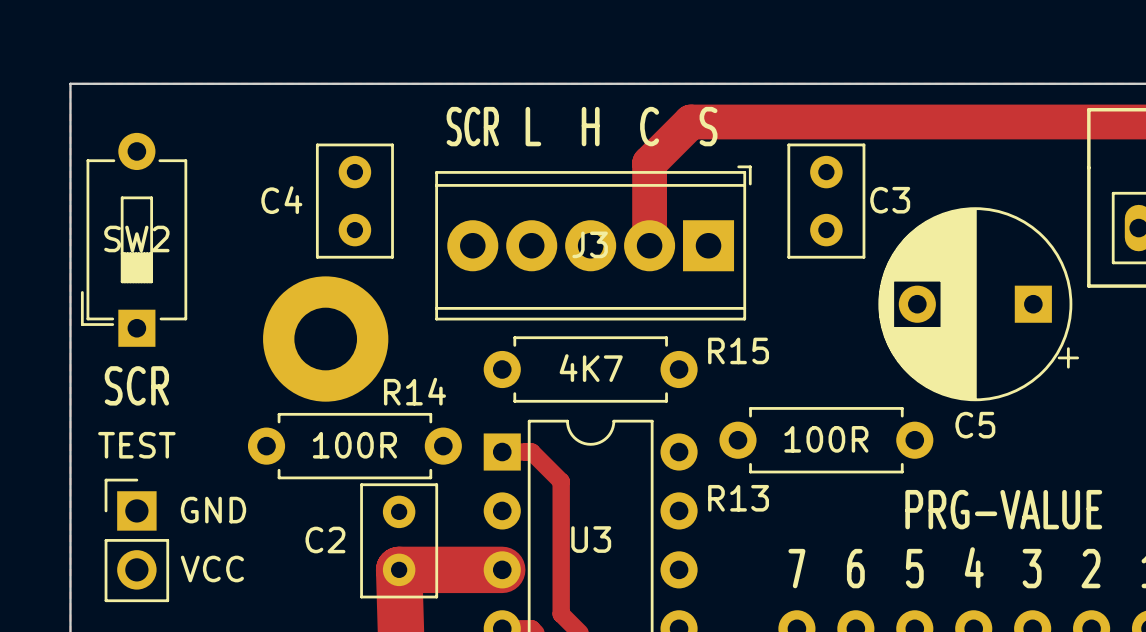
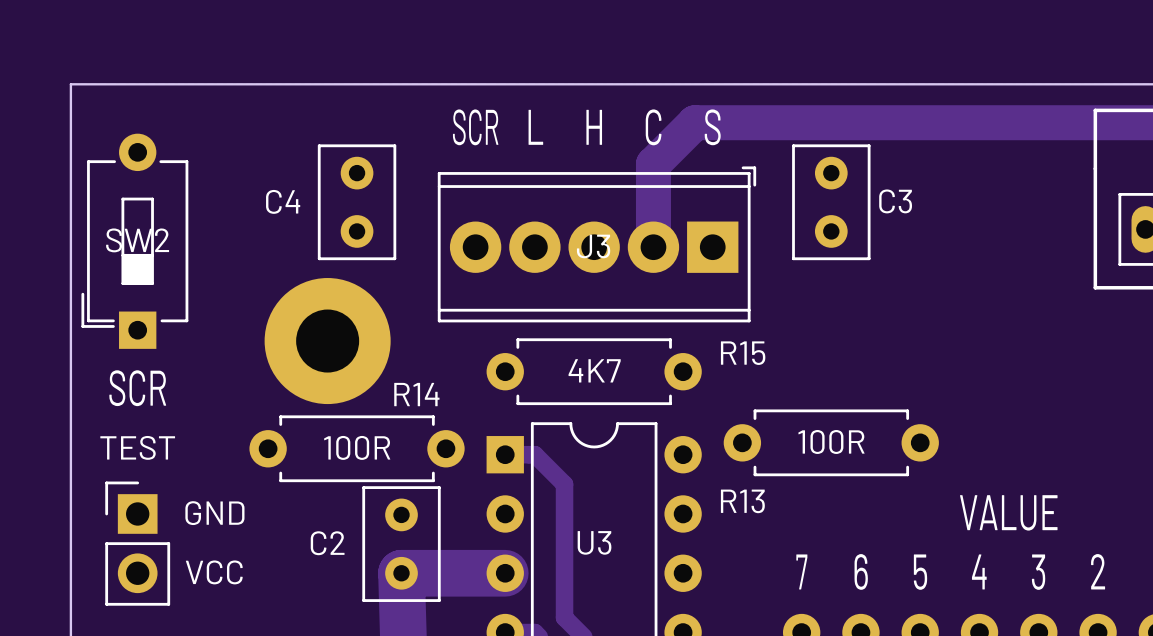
C5: (978, 304) -> none
part value: PRG-VALUE (1003, 509) -> VALUE (1008, 512)

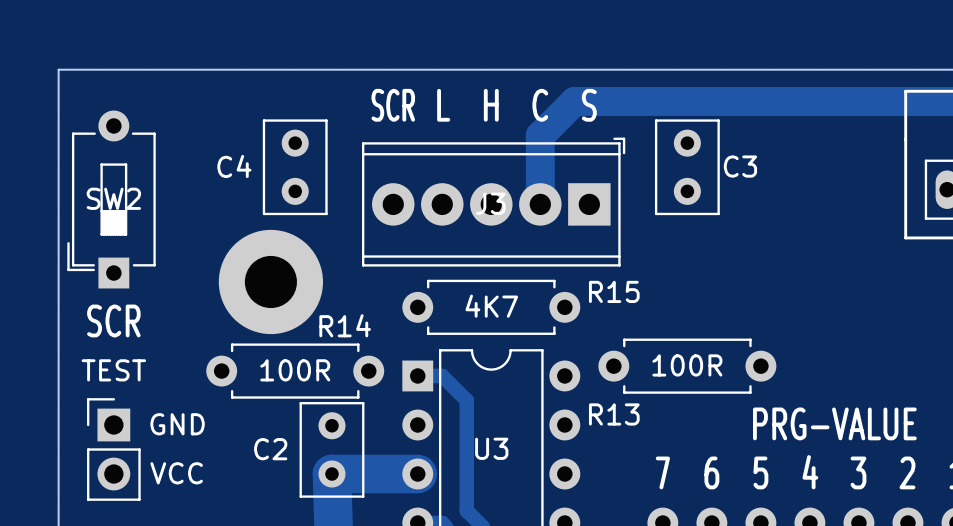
part value: VALUE (1008, 512) -> PRG-VALUE (834, 423)

